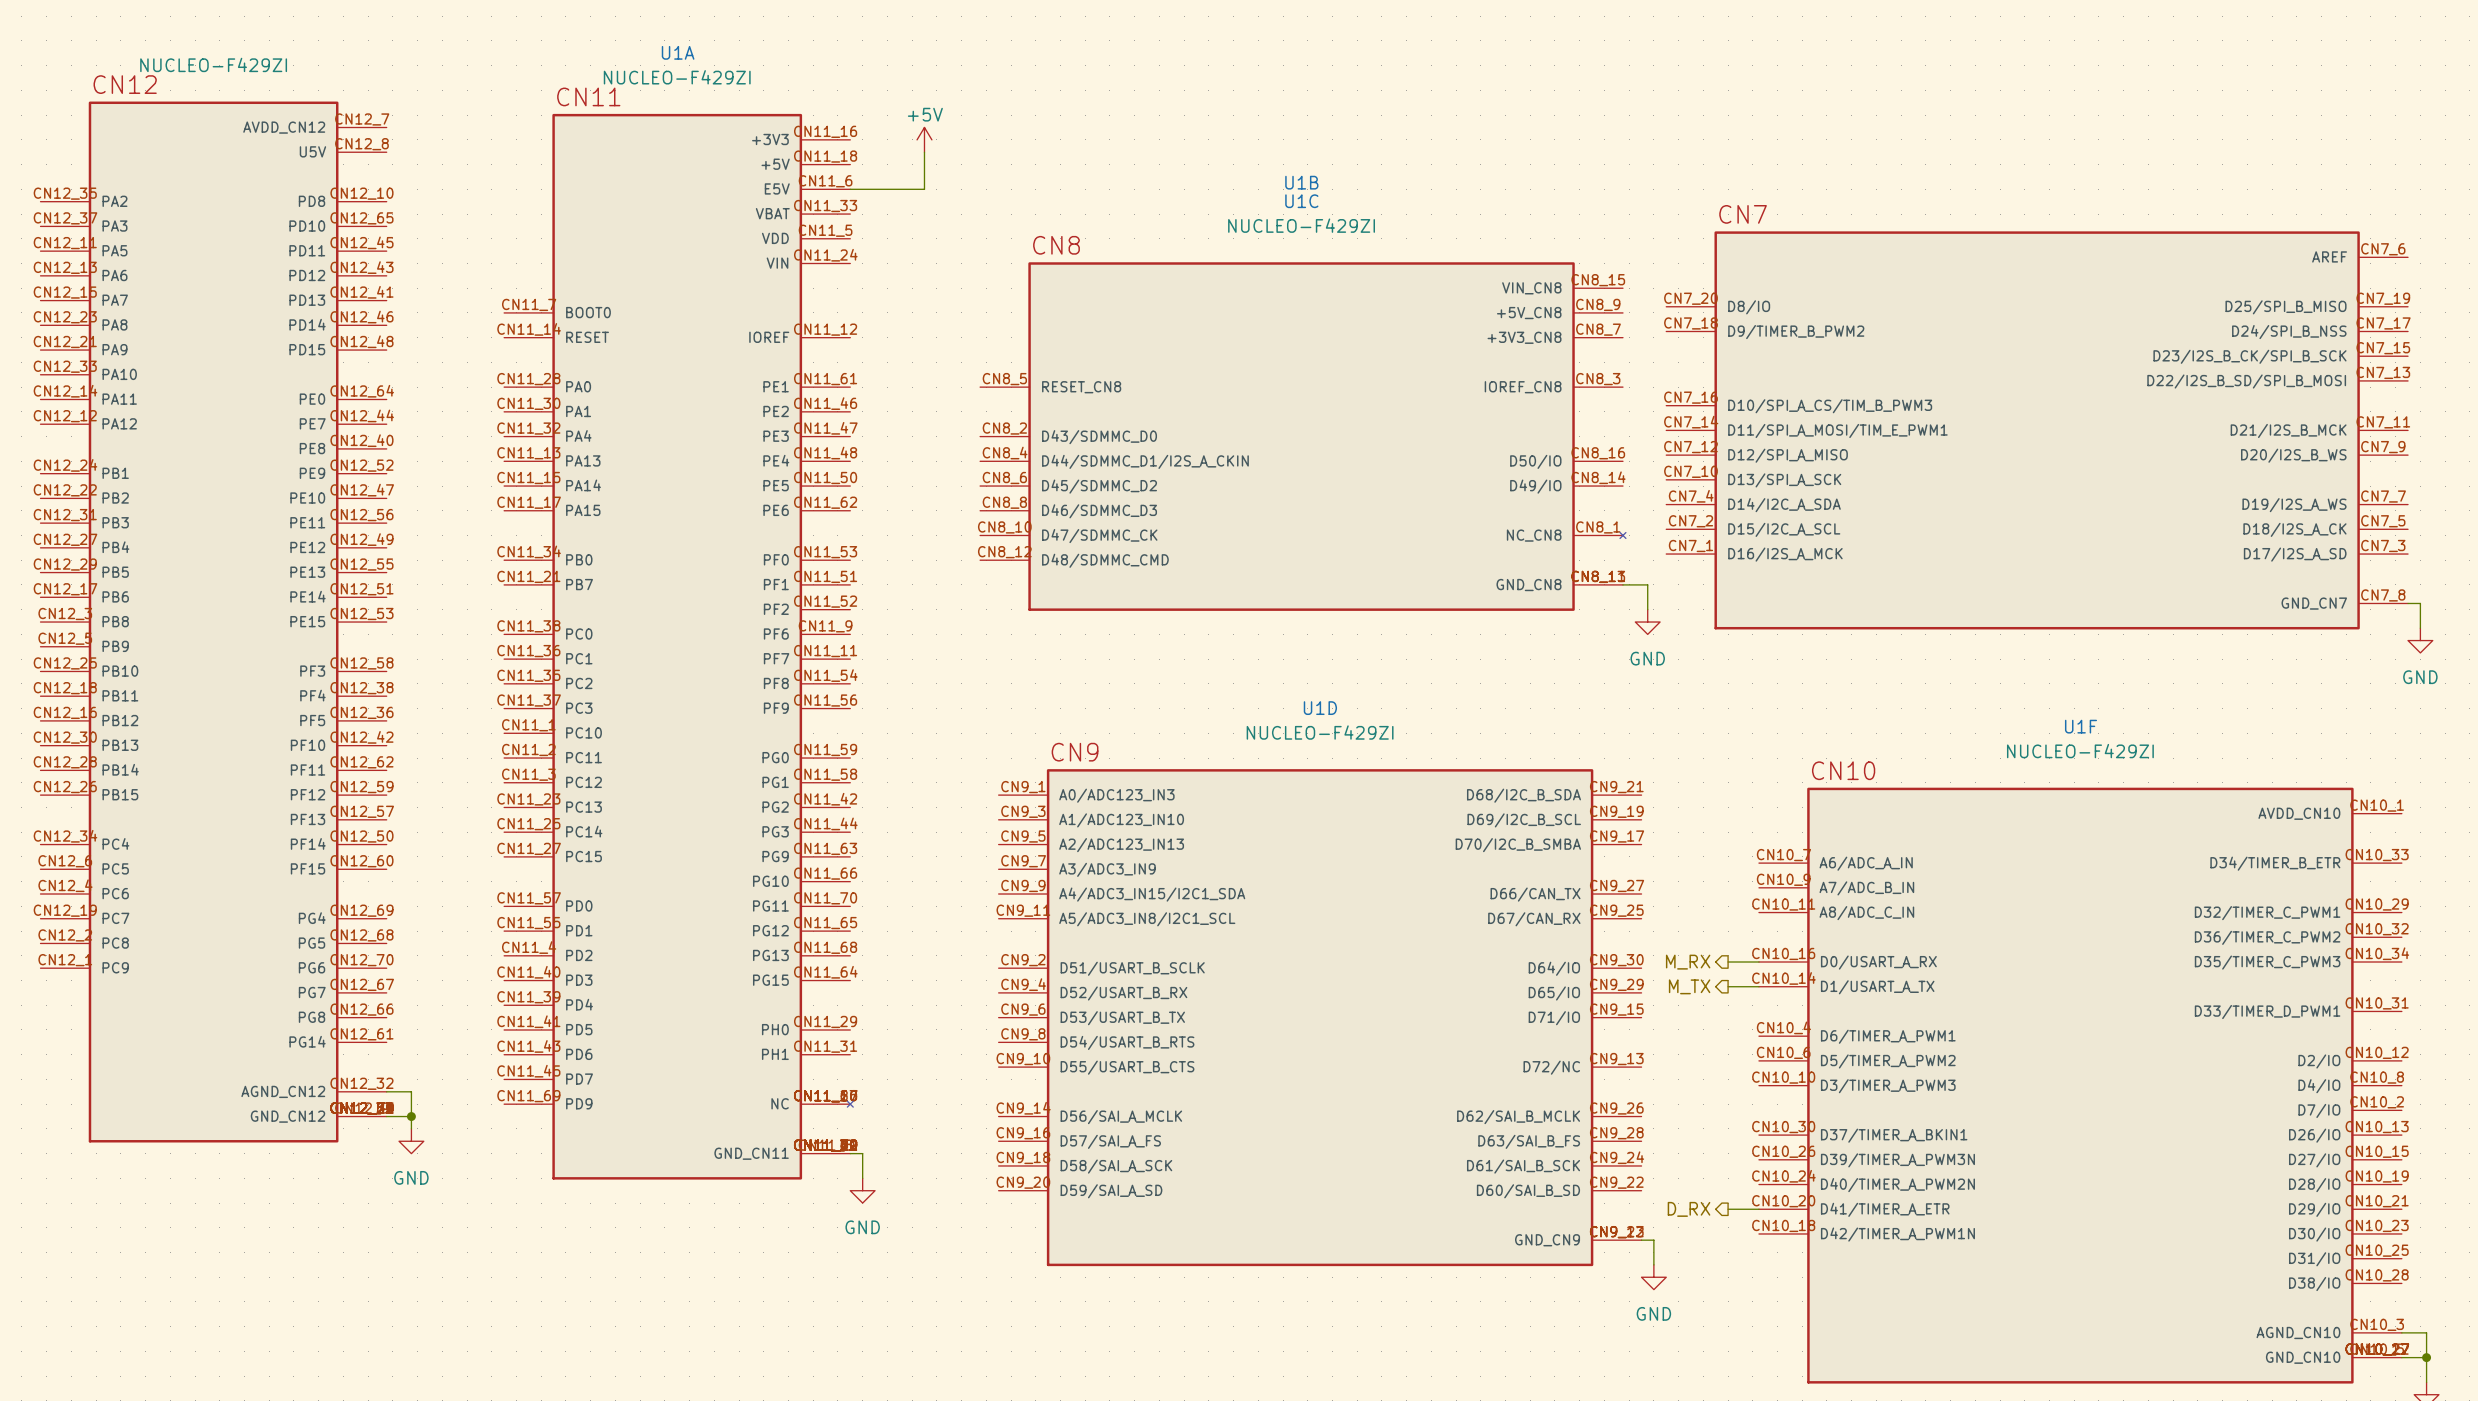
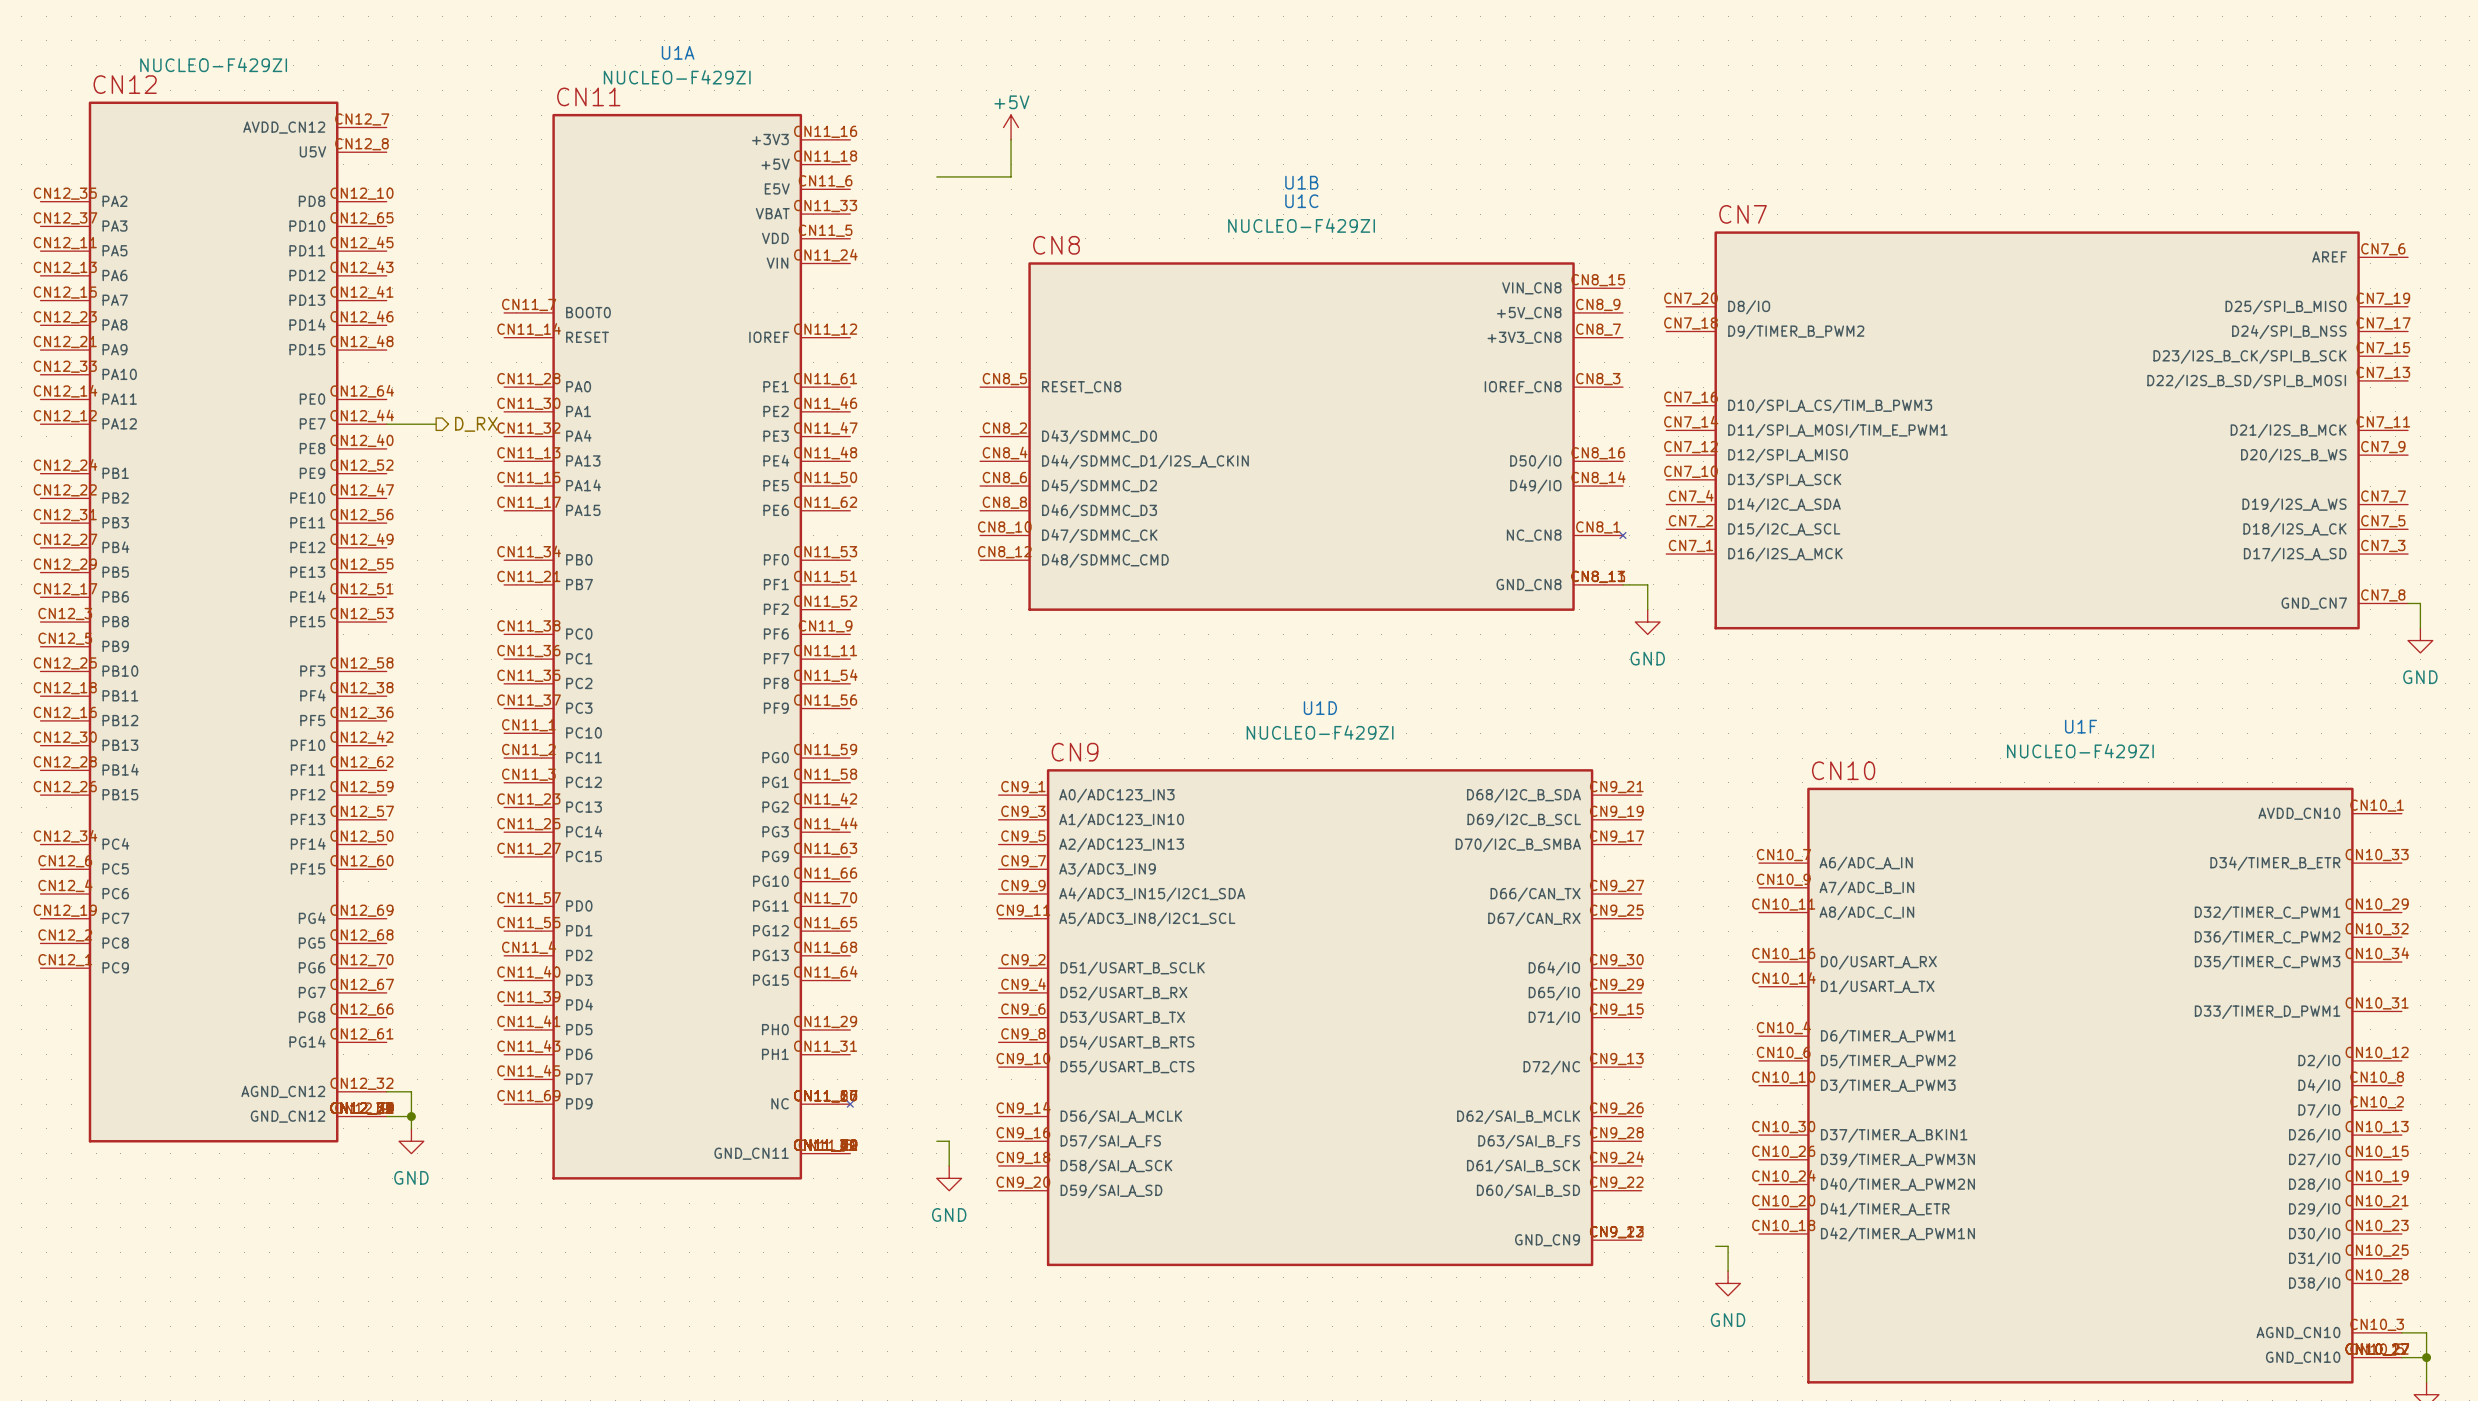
power symbol position: +5V (924, 139) -> +5V (1011, 127)
wire: (924, 152) (924, 189) (850, 189) -> (1011, 139) (1011, 176) (936, 176)
wire: none -> (386, 424) (436, 424)
hierarchical label: none -> D_RX (476, 424)
hierarchical label: M_RX (1688, 962) -> none
wire: (1728, 962) (1758, 962) -> none
hierarchical label: M_TX (1689, 986) -> none
wire: (1728, 986) (1758, 986) -> none
wire: (850, 1153) (862, 1153) (862, 1178) -> (936, 1141) (949, 1141) (949, 1165)
power symbol position: GND (862, 1190) -> GND (949, 1178)
hierarchical label: D_RX (1689, 1209) -> none
wire: (1728, 1209) (1758, 1209) -> none
wire: (1641, 1240) (1653, 1240) (1653, 1264) -> (1715, 1246) (1728, 1246) (1728, 1271)
power symbol position: GND (1653, 1277) -> GND (1728, 1283)

